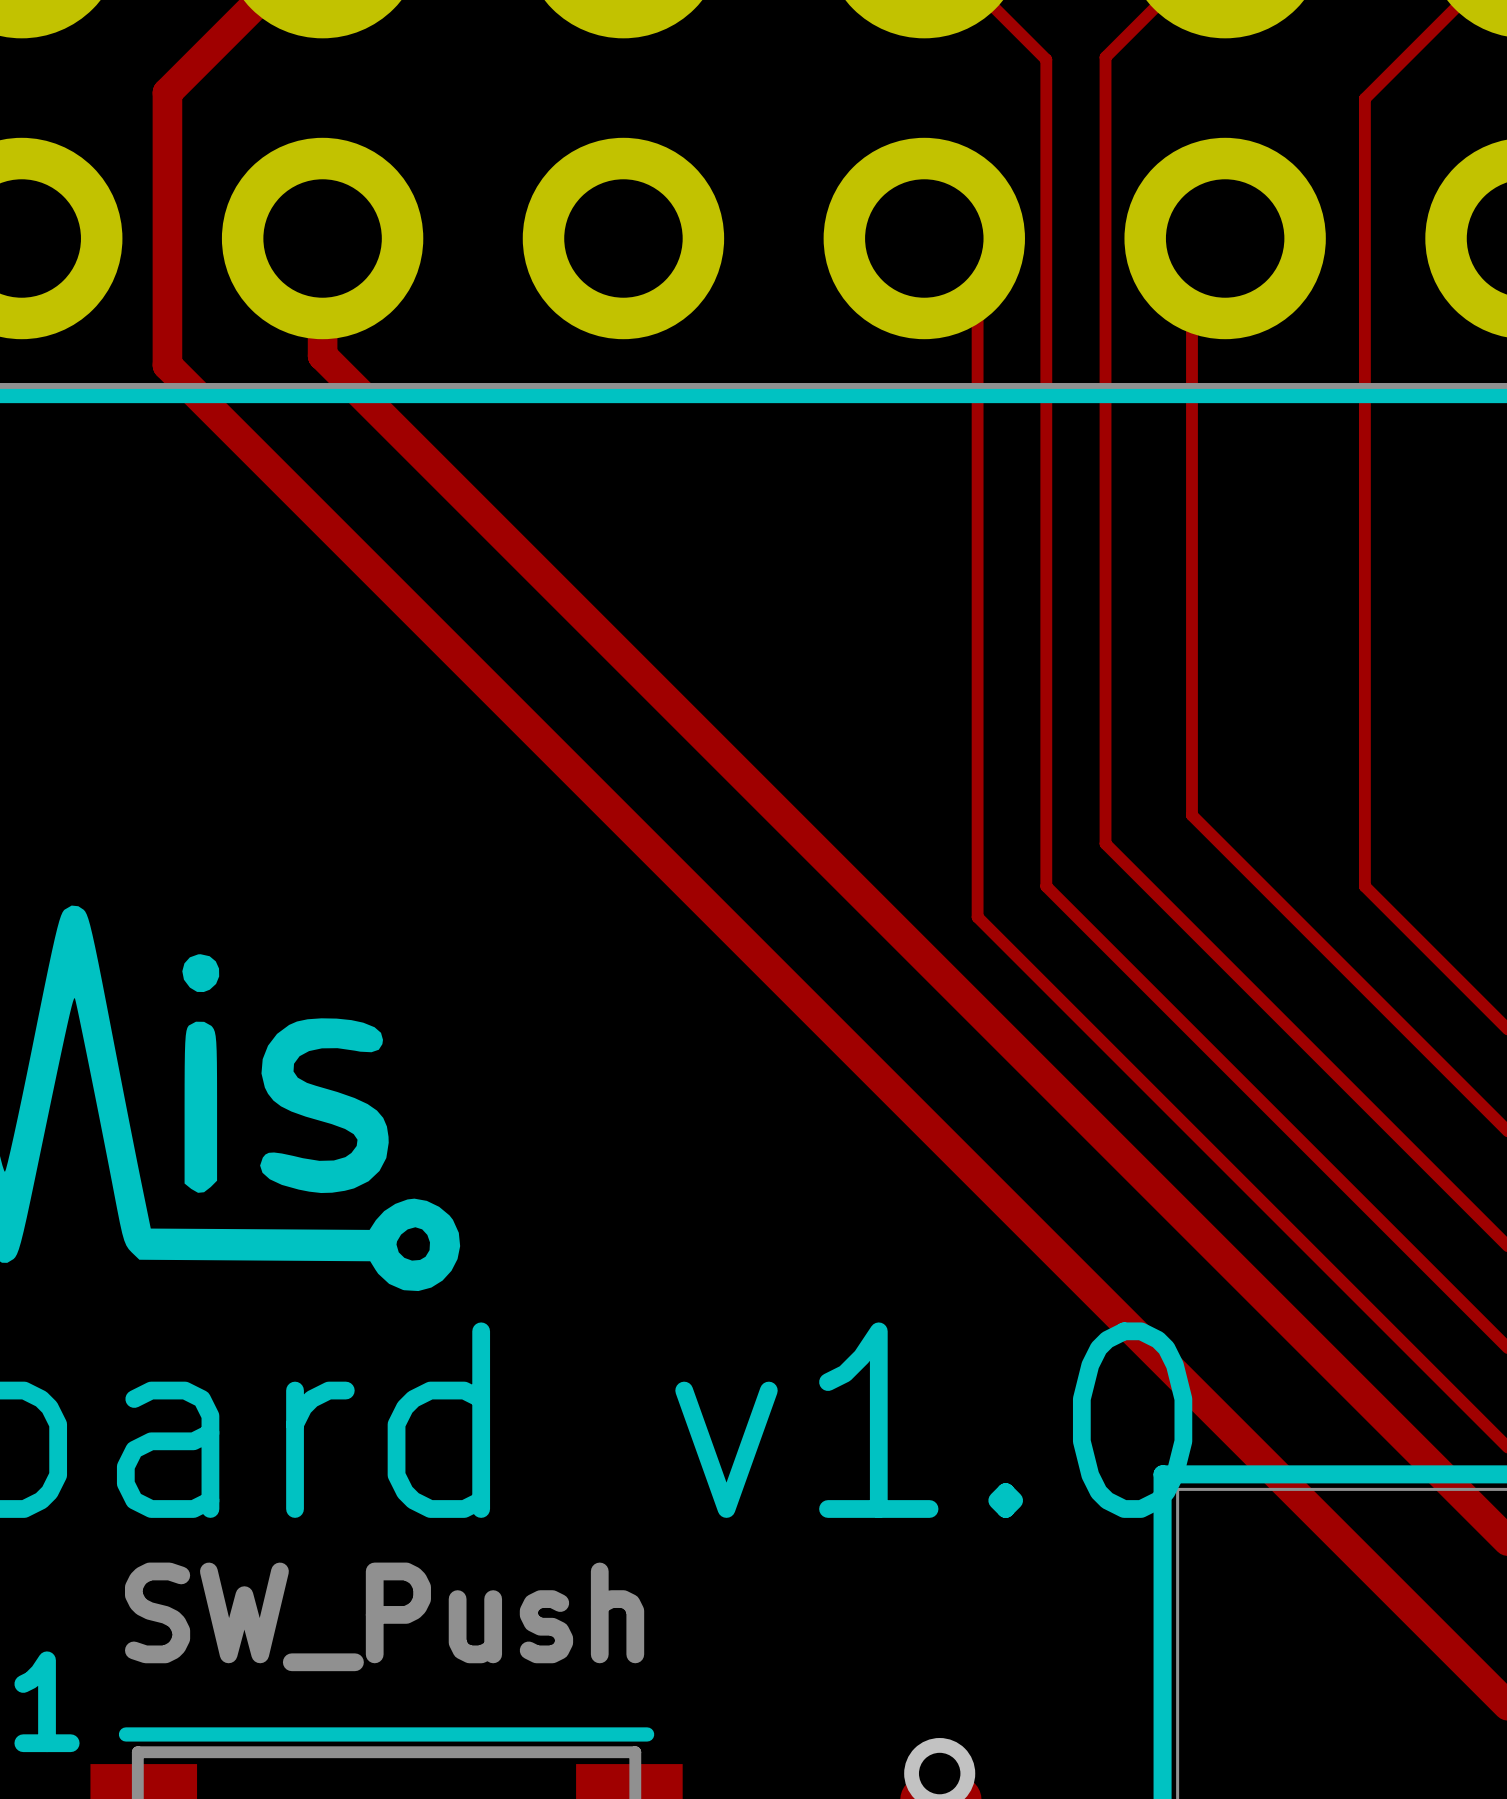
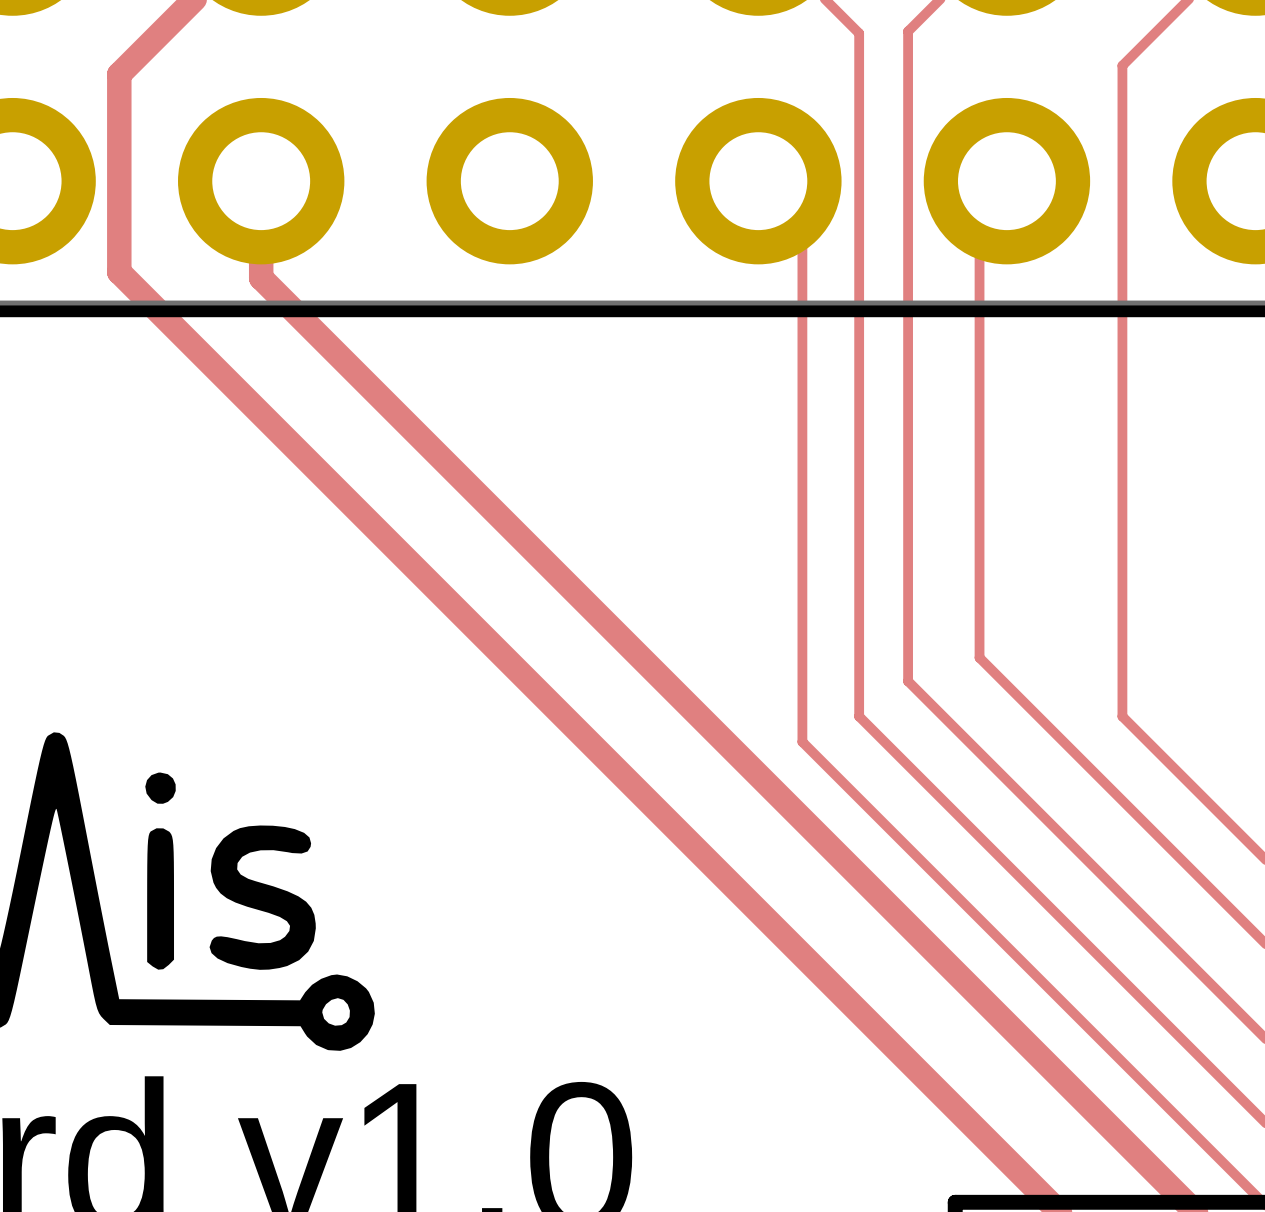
track: (167, 92) (167, 365) -> (132, 60) (119, 74) (119, 272) (132, 285)

